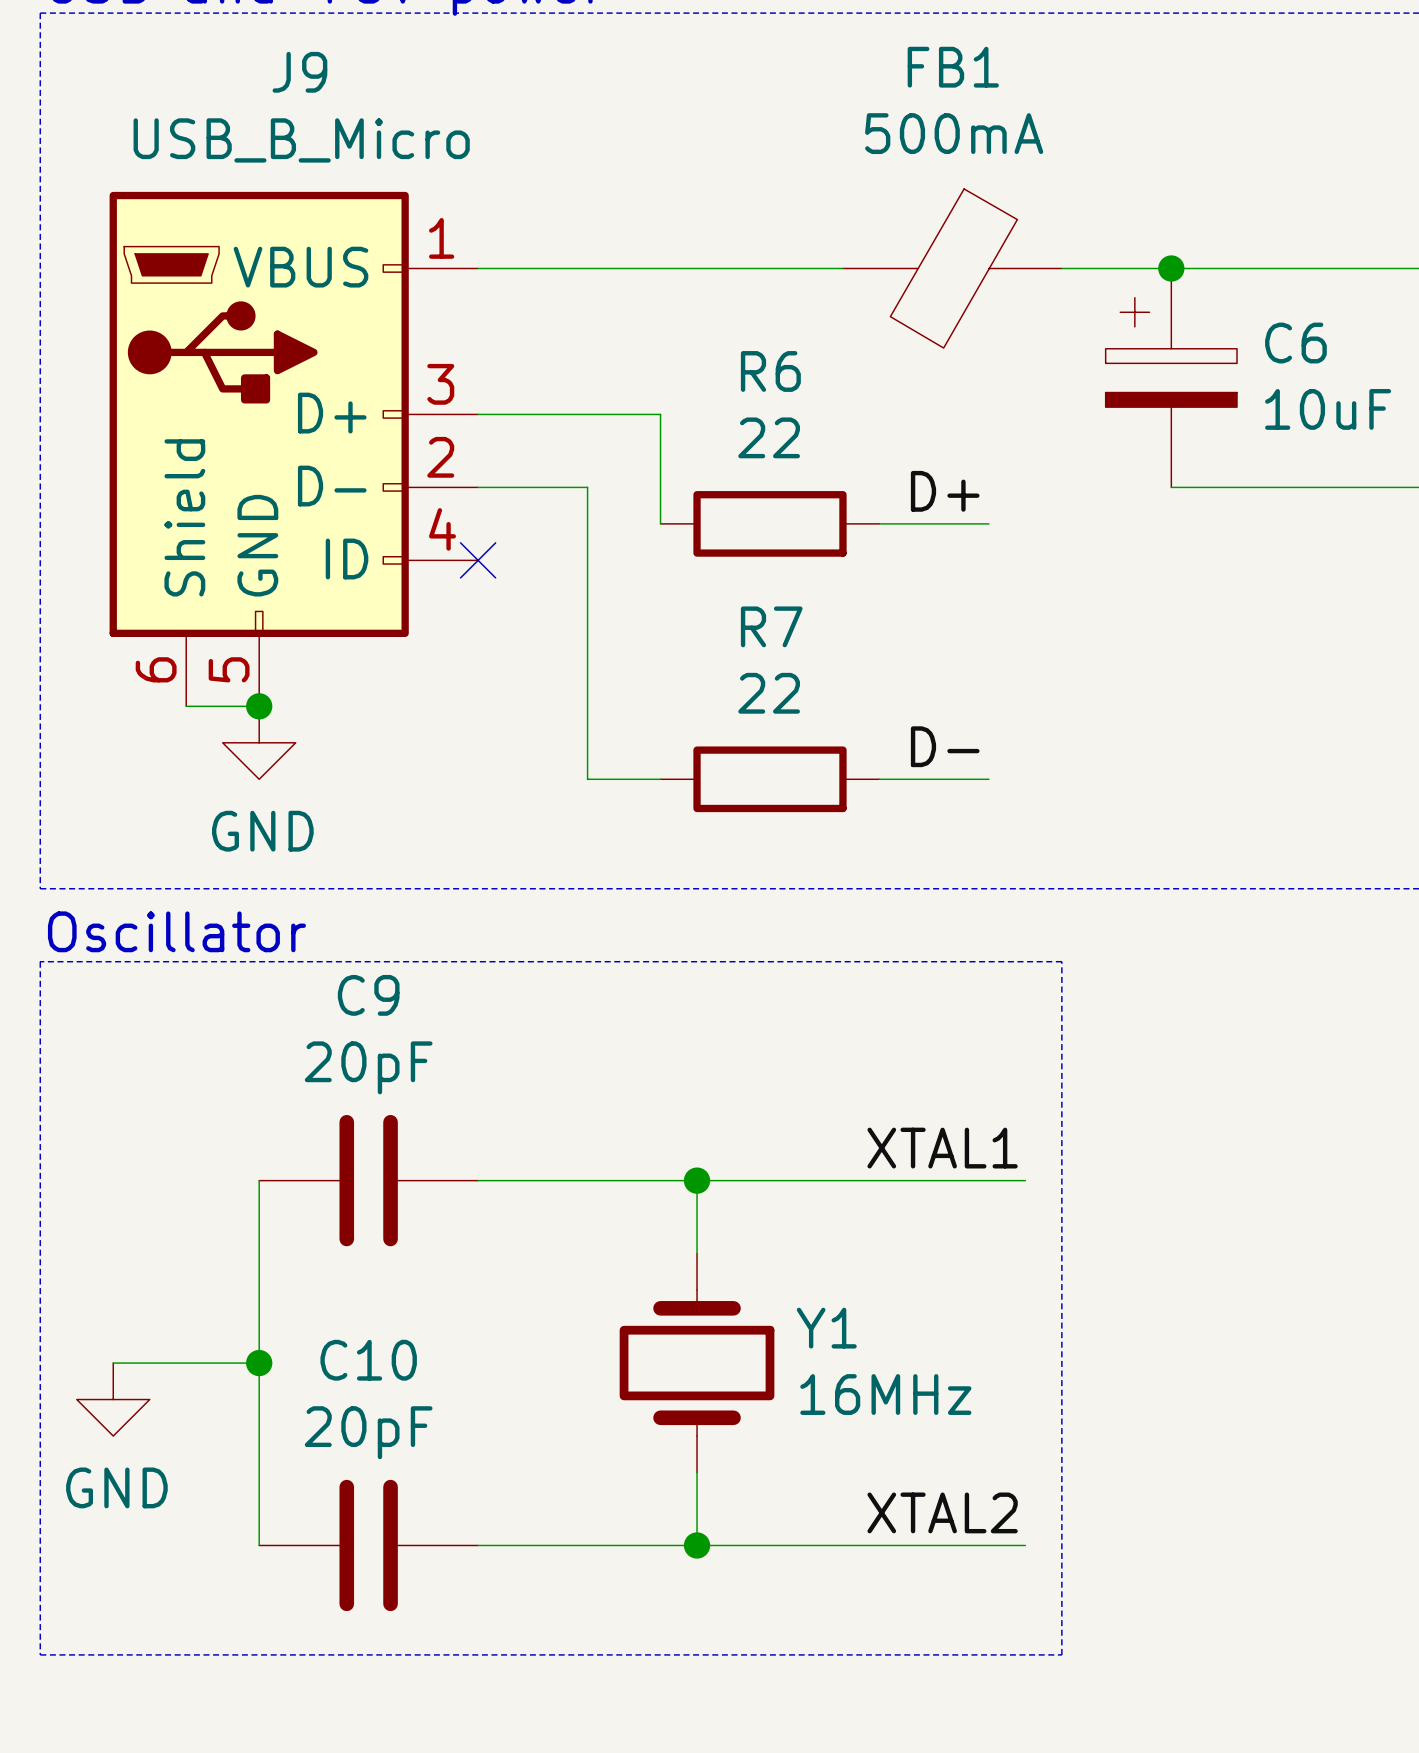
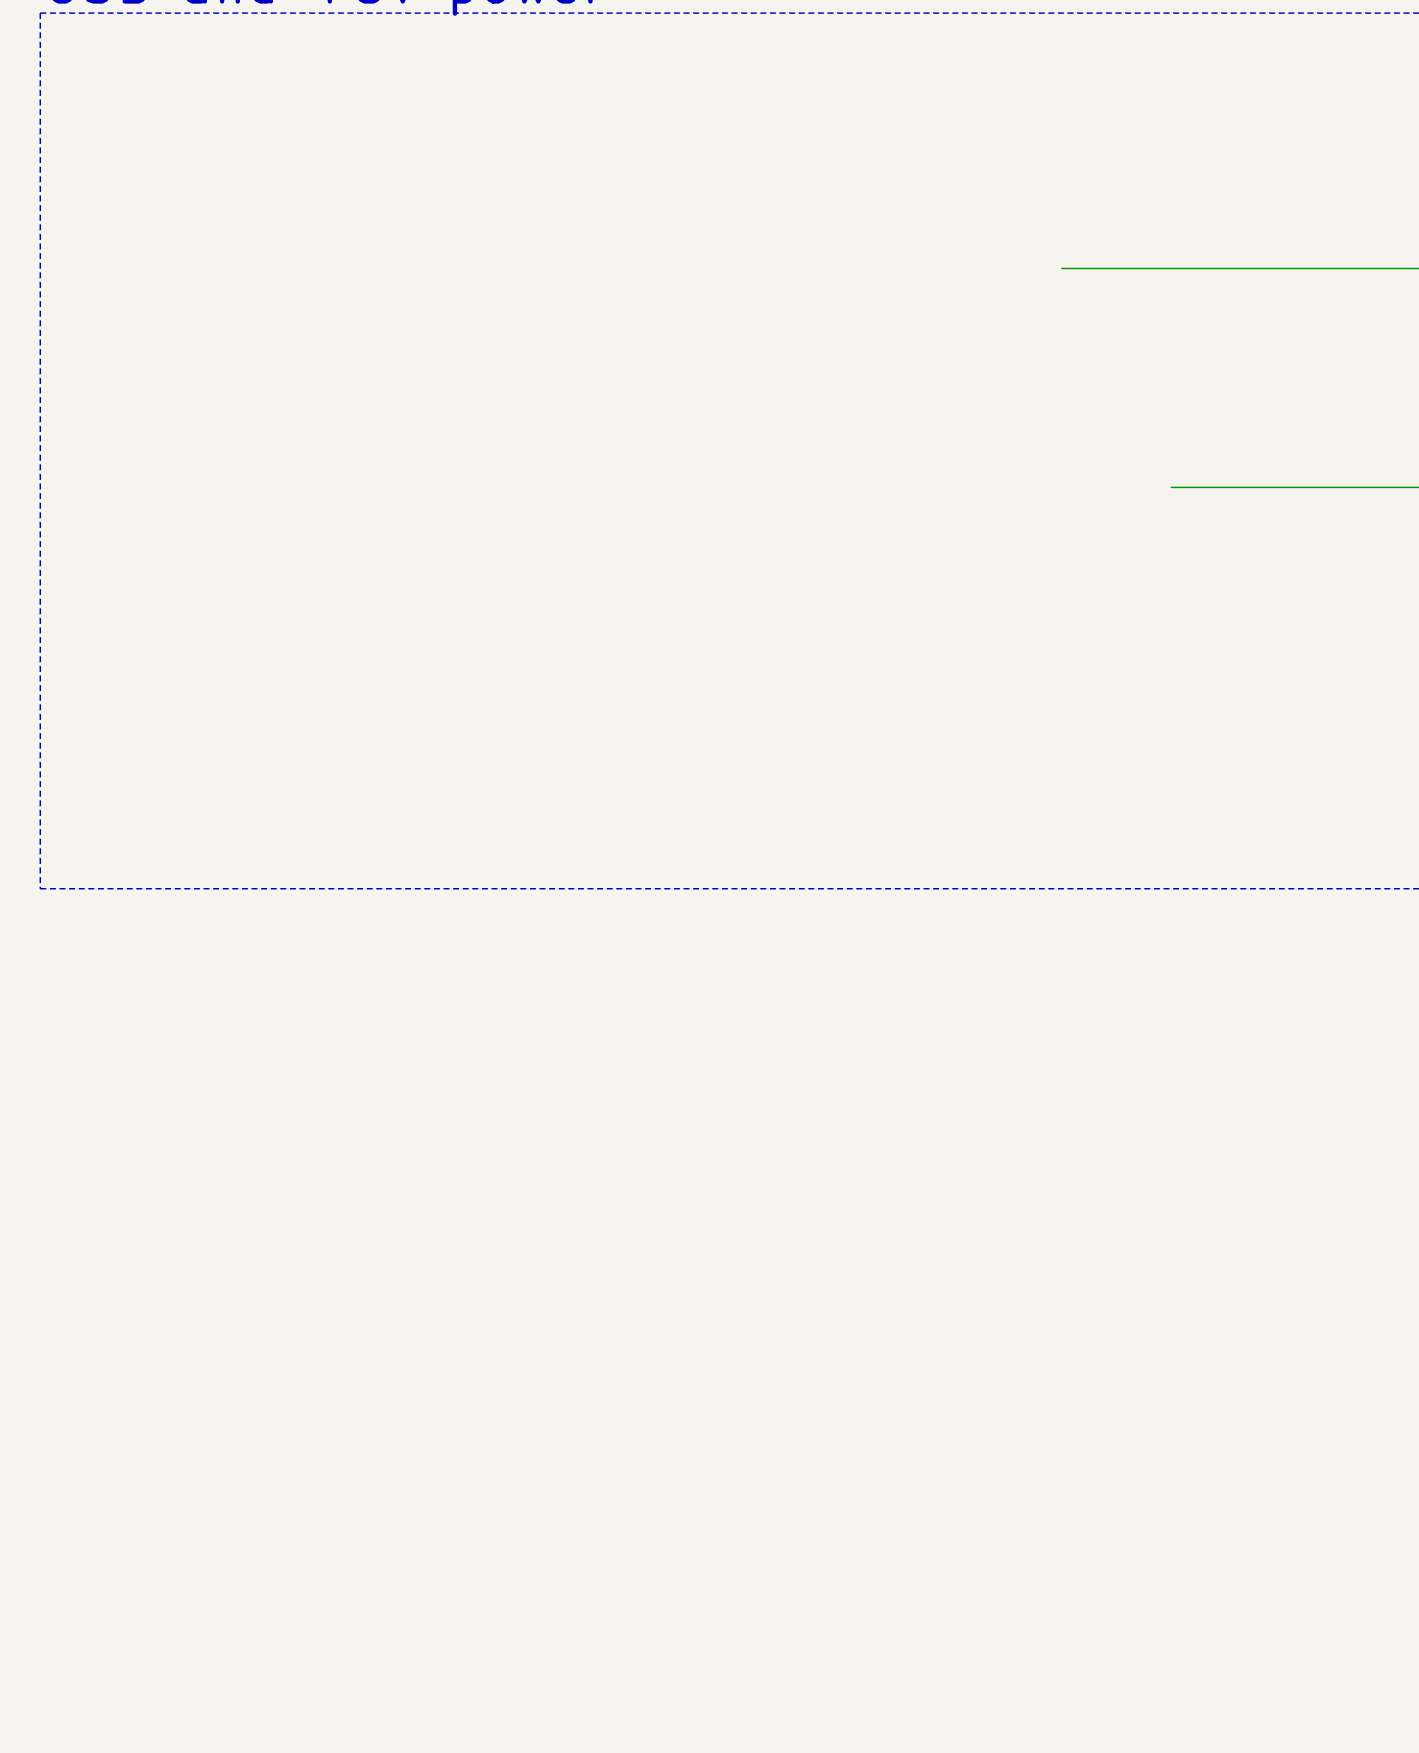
wire: (478, 268) (842, 268) -> none
FB1: 500mA (952, 268) -> none
junction: (1171, 268) -> none
C6: 10uF (1171, 377) -> none
wire: (478, 414) (660, 414) (660, 523) -> none
J9: USB_B_Micro (293, 449) -> none
wire: (478, 487) (587, 487) (587, 779) (660, 779) -> none
label: D+ (945, 491) -> none
R6: 22 (769, 523) -> none
wire: (879, 523) (988, 523) -> none
no-connect mark: (478, 560) -> none
wire: (186, 706) (259, 706) -> none
junction: (259, 706) -> none
power symbol: GND (259, 742) -> none
label: D- (945, 746) -> none
R7: 22 (769, 779) -> none
wire: (879, 779) (988, 779) -> none
text: Oscillator (176, 931) -> none
line: (40, 961) (40, 1654) (1061, 1654) (1061, 961) (40, 961) -> none
label: XTAL1 (942, 1148) -> none
wire: (259, 1180) (259, 1545) -> none
C9: 20pF (368, 1180) -> none
wire: (478, 1180) (1025, 1180) -> none
wire: (697, 1180) (697, 1253) -> none
junction: (697, 1180) -> none
wire: (113, 1363) (259, 1363) -> none
junction: (259, 1363) -> none
Y1: 16MHz (697, 1363) -> none
power symbol: GND (113, 1399) -> none
wire: (697, 1472) (697, 1545) -> none
label: XTAL2 (942, 1512) -> none
C10: 20pF (368, 1545) -> none
wire: (478, 1545) (1025, 1545) -> none
junction: (697, 1545) -> none

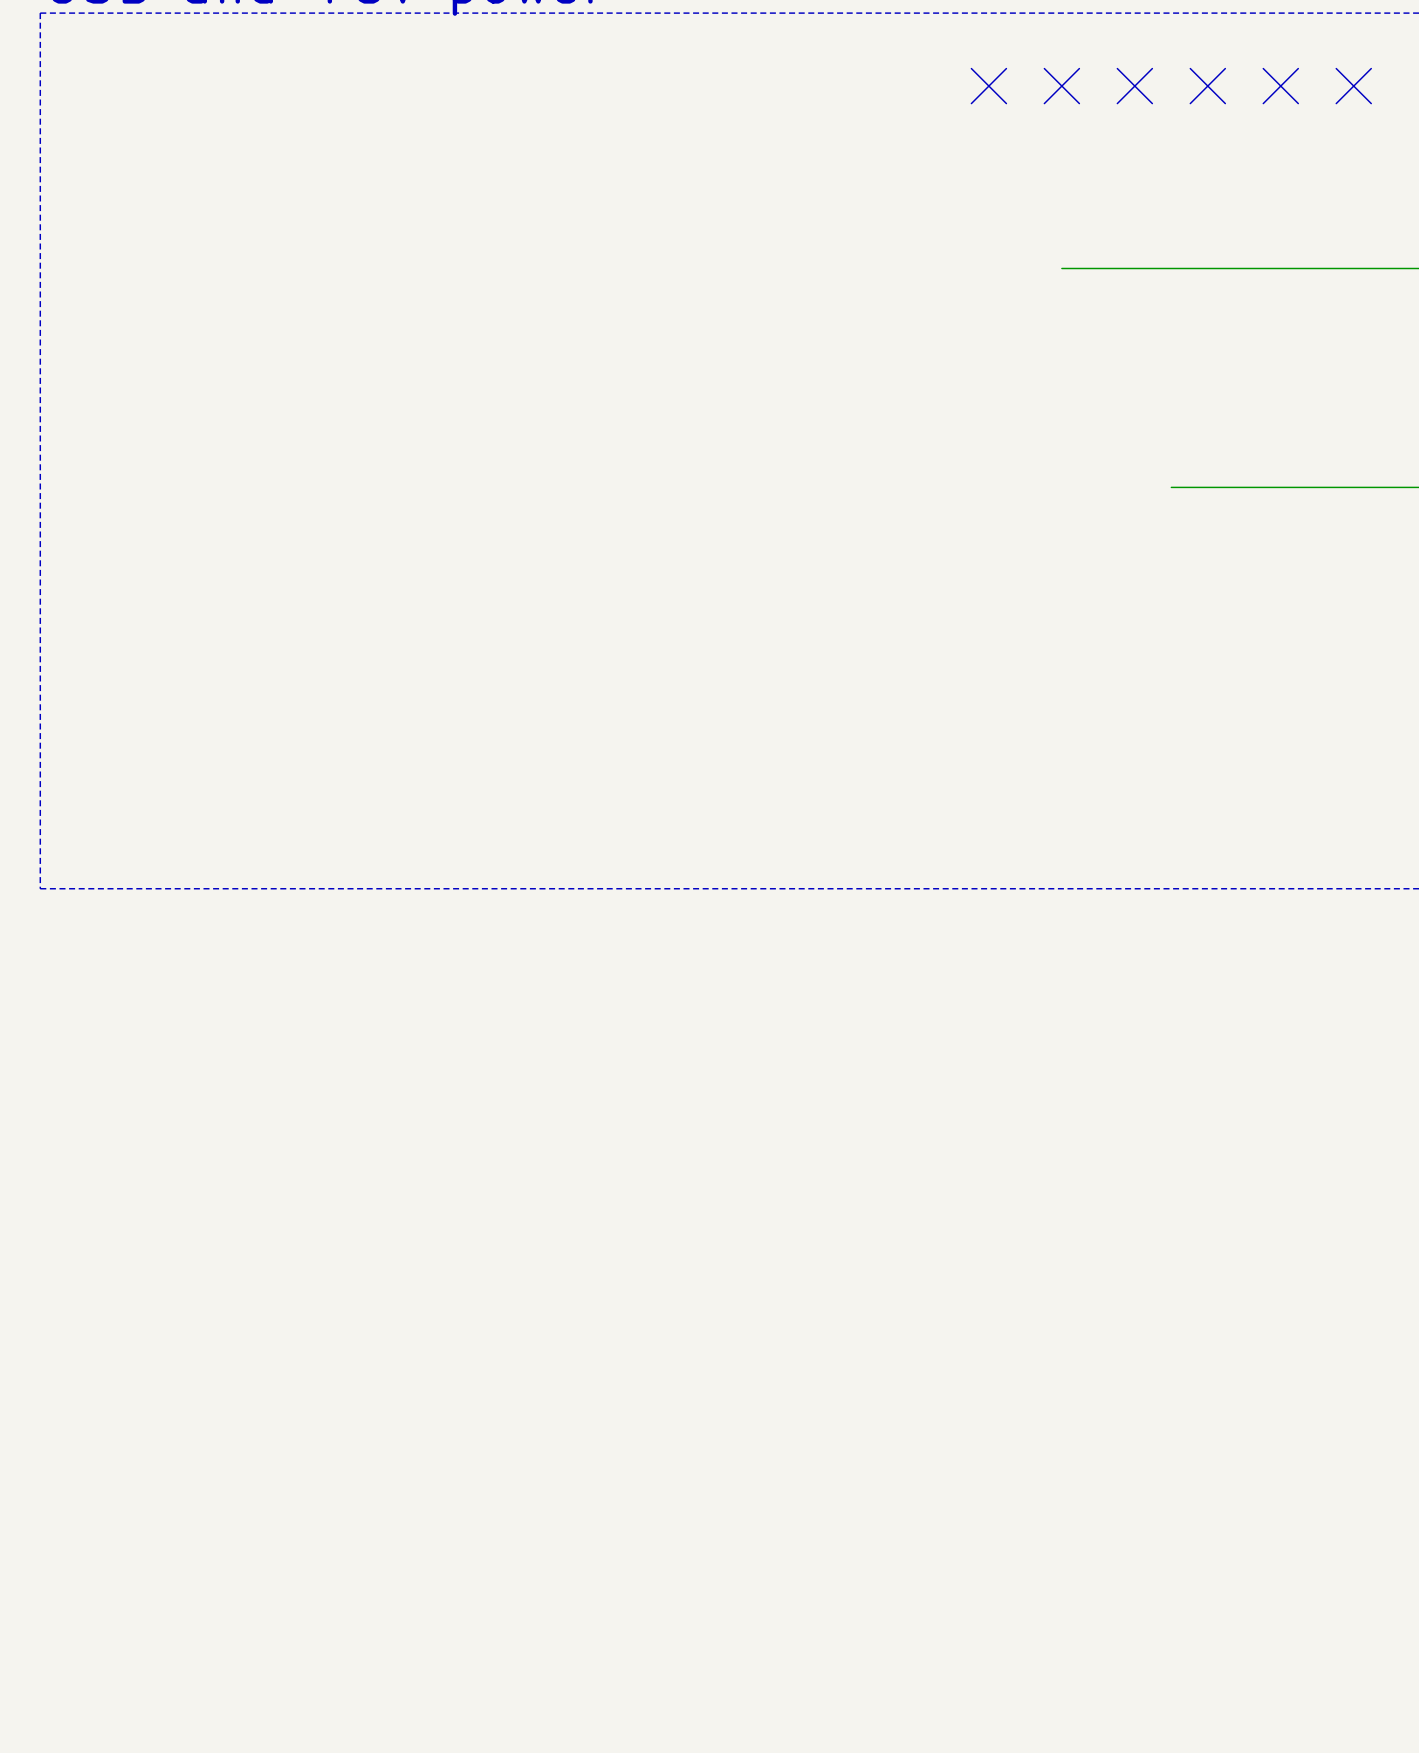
no-connect mark: none -> (988, 86)
no-connect mark: none -> (1061, 86)
no-connect mark: none -> (1134, 86)
no-connect mark: none -> (1207, 86)
no-connect mark: none -> (1280, 86)
no-connect mark: none -> (1353, 86)

